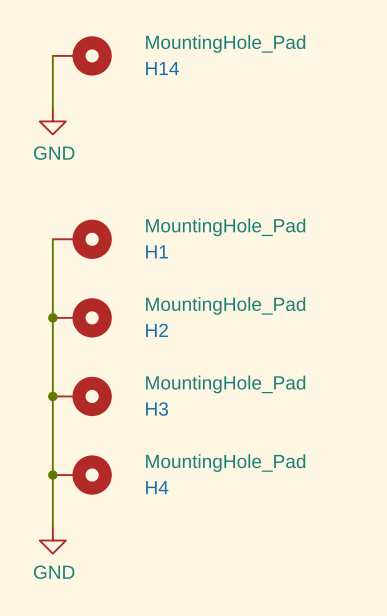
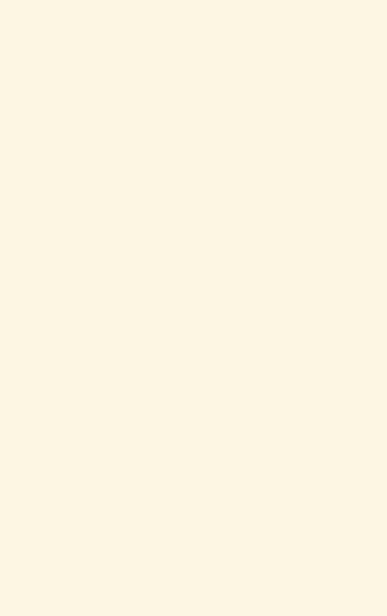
wire: (52, 55) (52, 108) -> none
H14: MountingHole_Pad (82, 55) -> none
power symbol: GND (52, 121) -> none
wire: (52, 239) (52, 527) -> none
H1: MountingHole_Pad (82, 239) -> none
junction: (52, 317) -> none
H2: MountingHole_Pad (82, 317) -> none
junction: (52, 396) -> none
H3: MountingHole_Pad (82, 396) -> none
junction: (52, 475) -> none
H4: MountingHole_Pad (82, 475) -> none
power symbol: GND (52, 540) -> none

